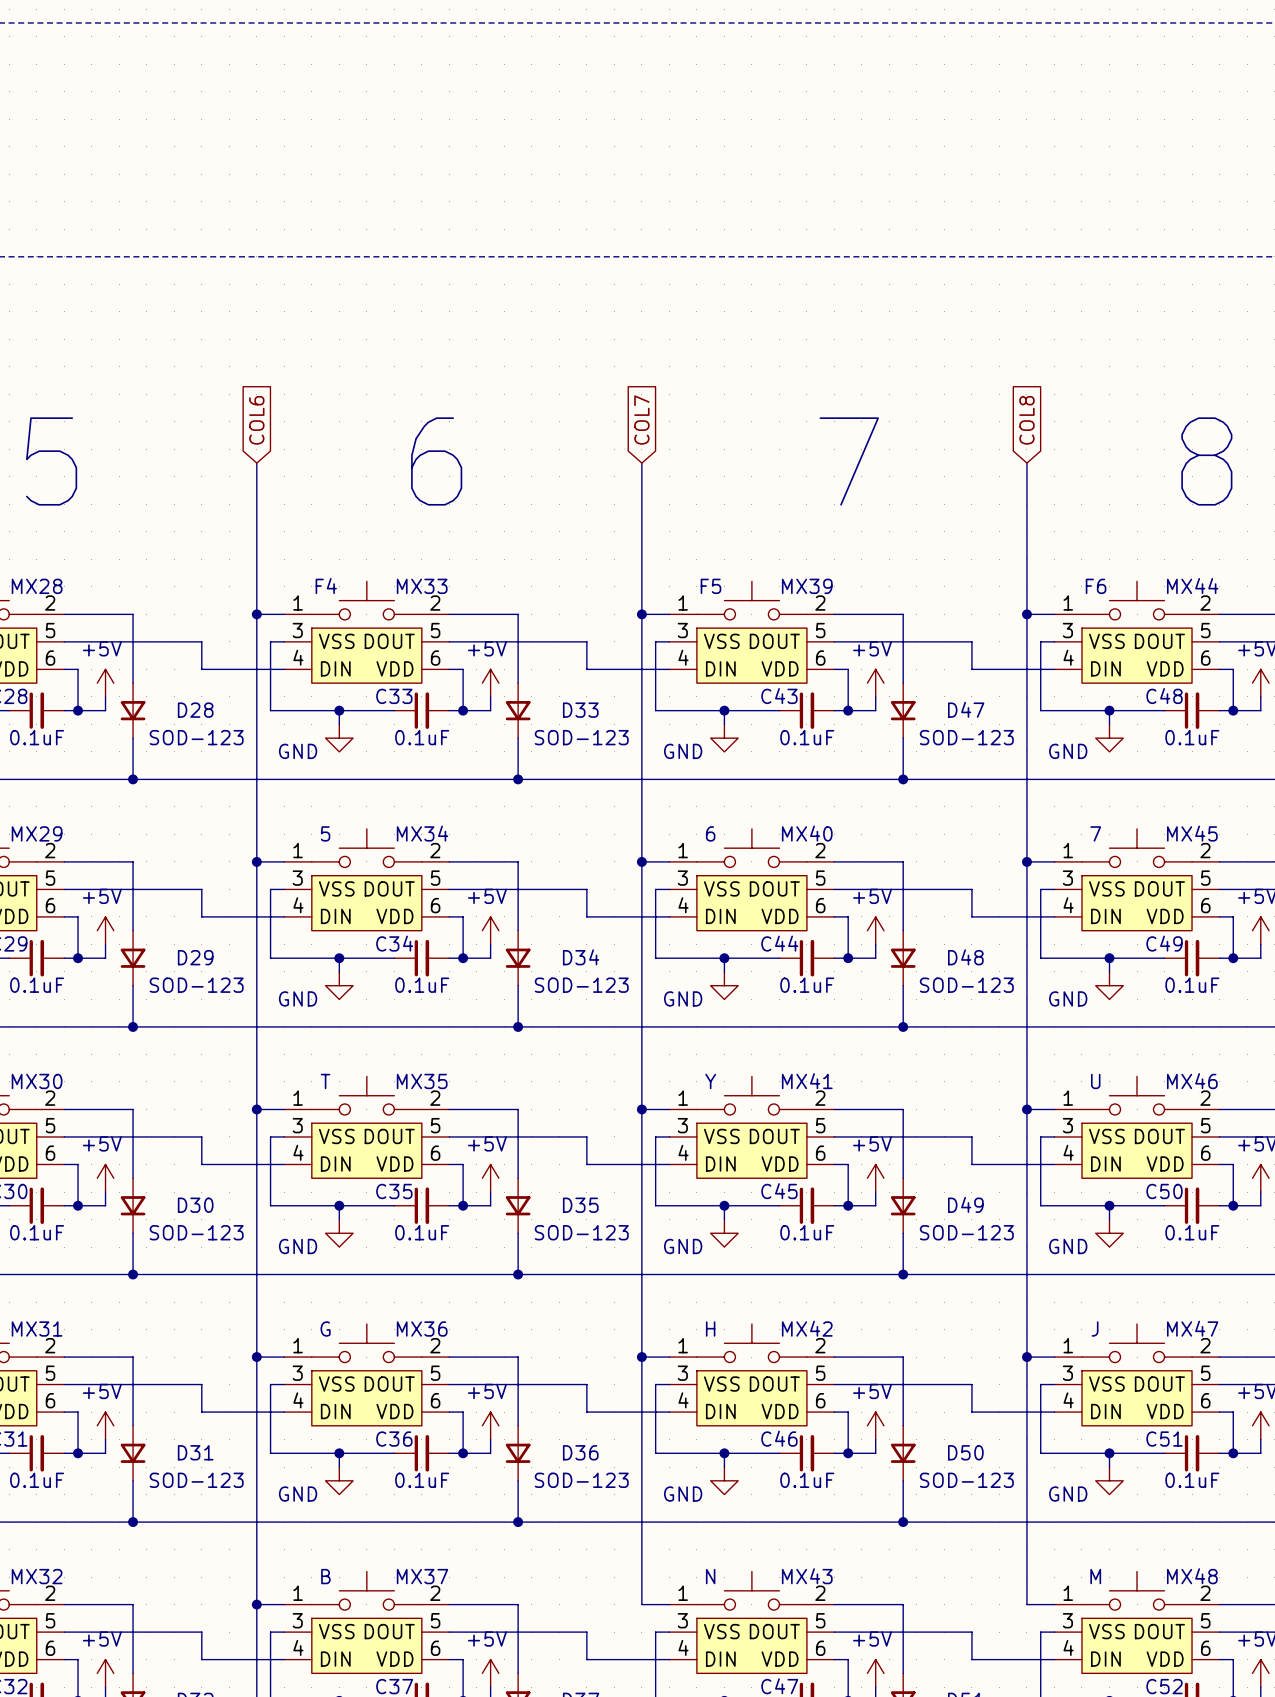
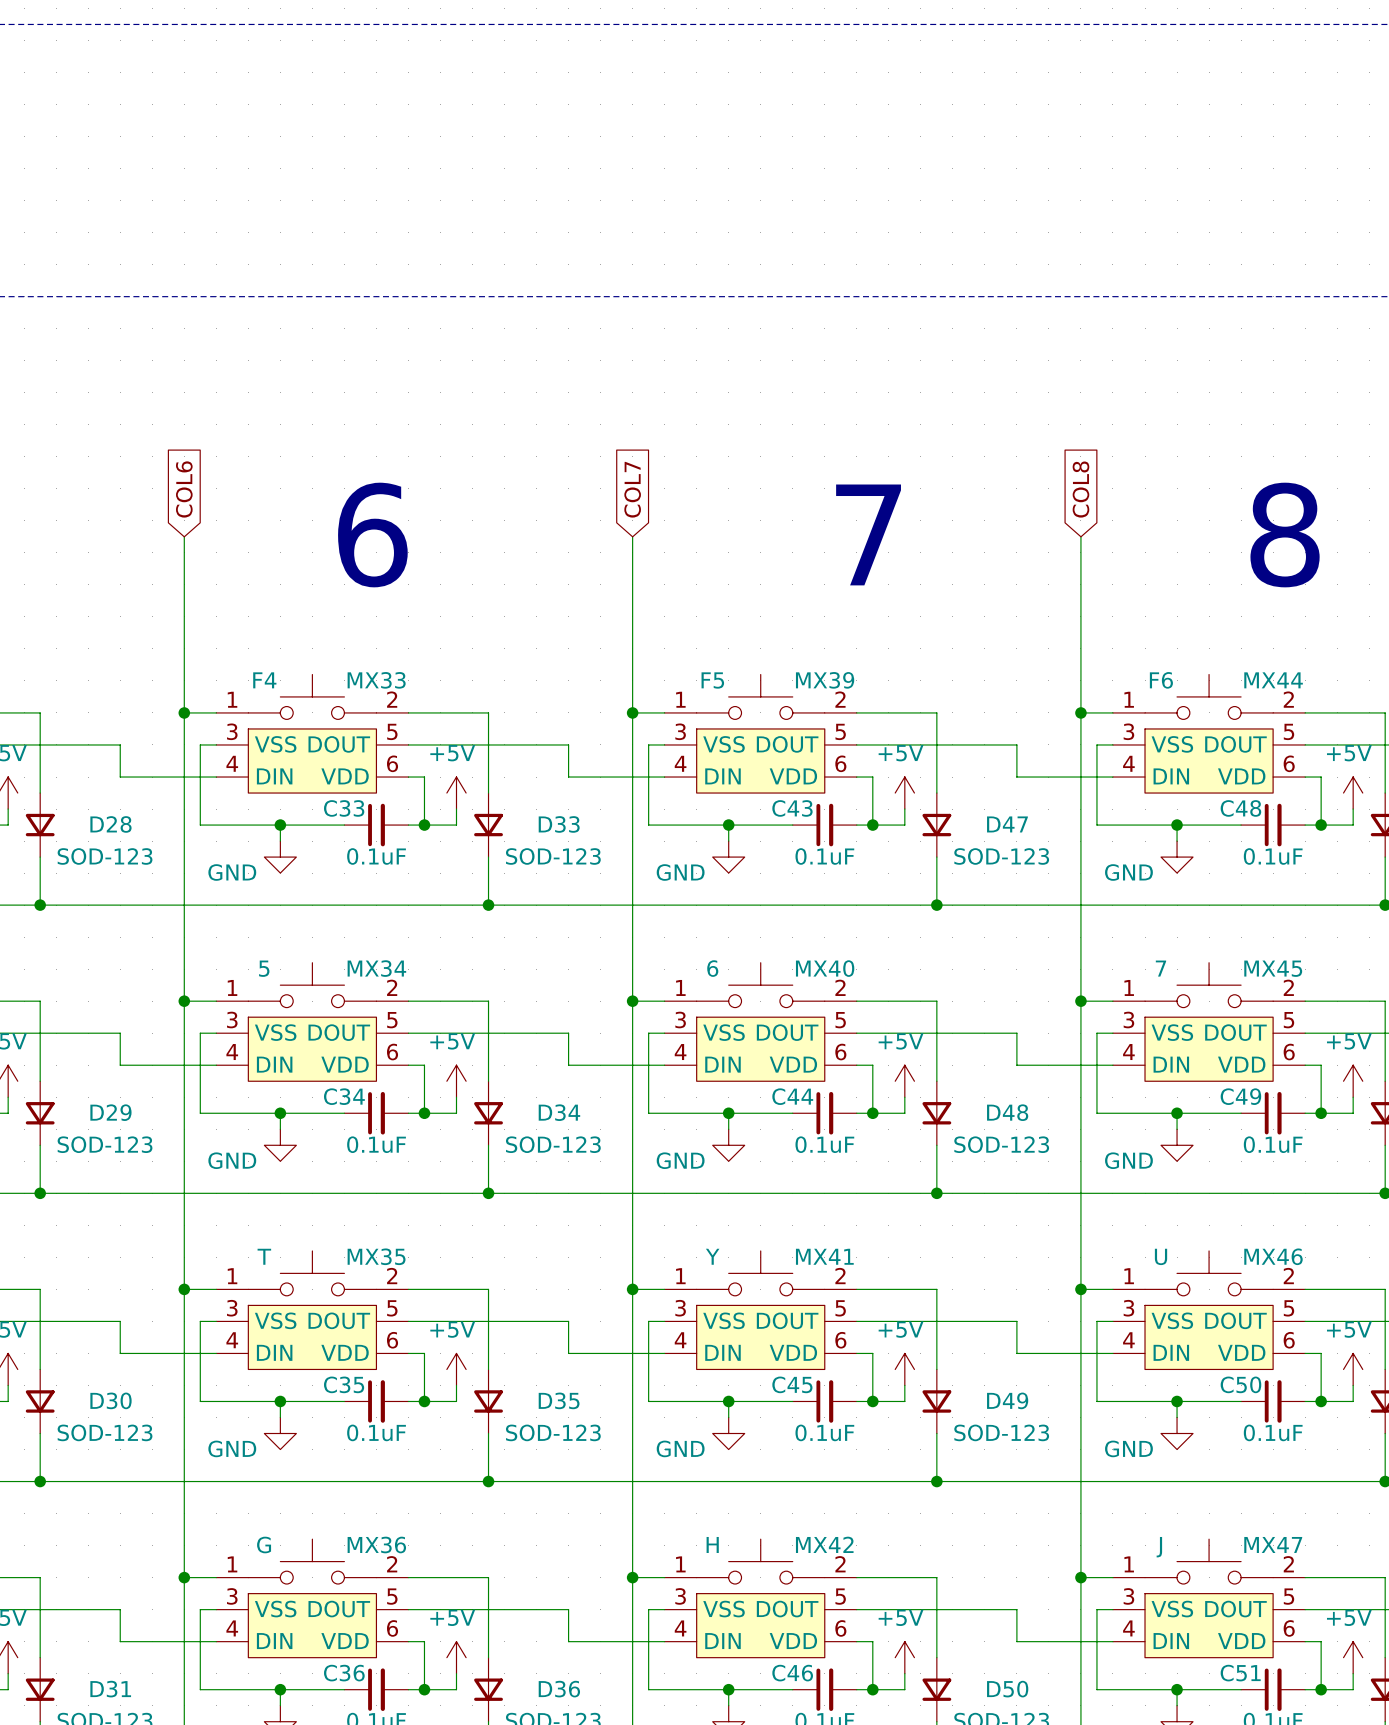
text position: 6 (436, 461) -> 6 (372, 535)

